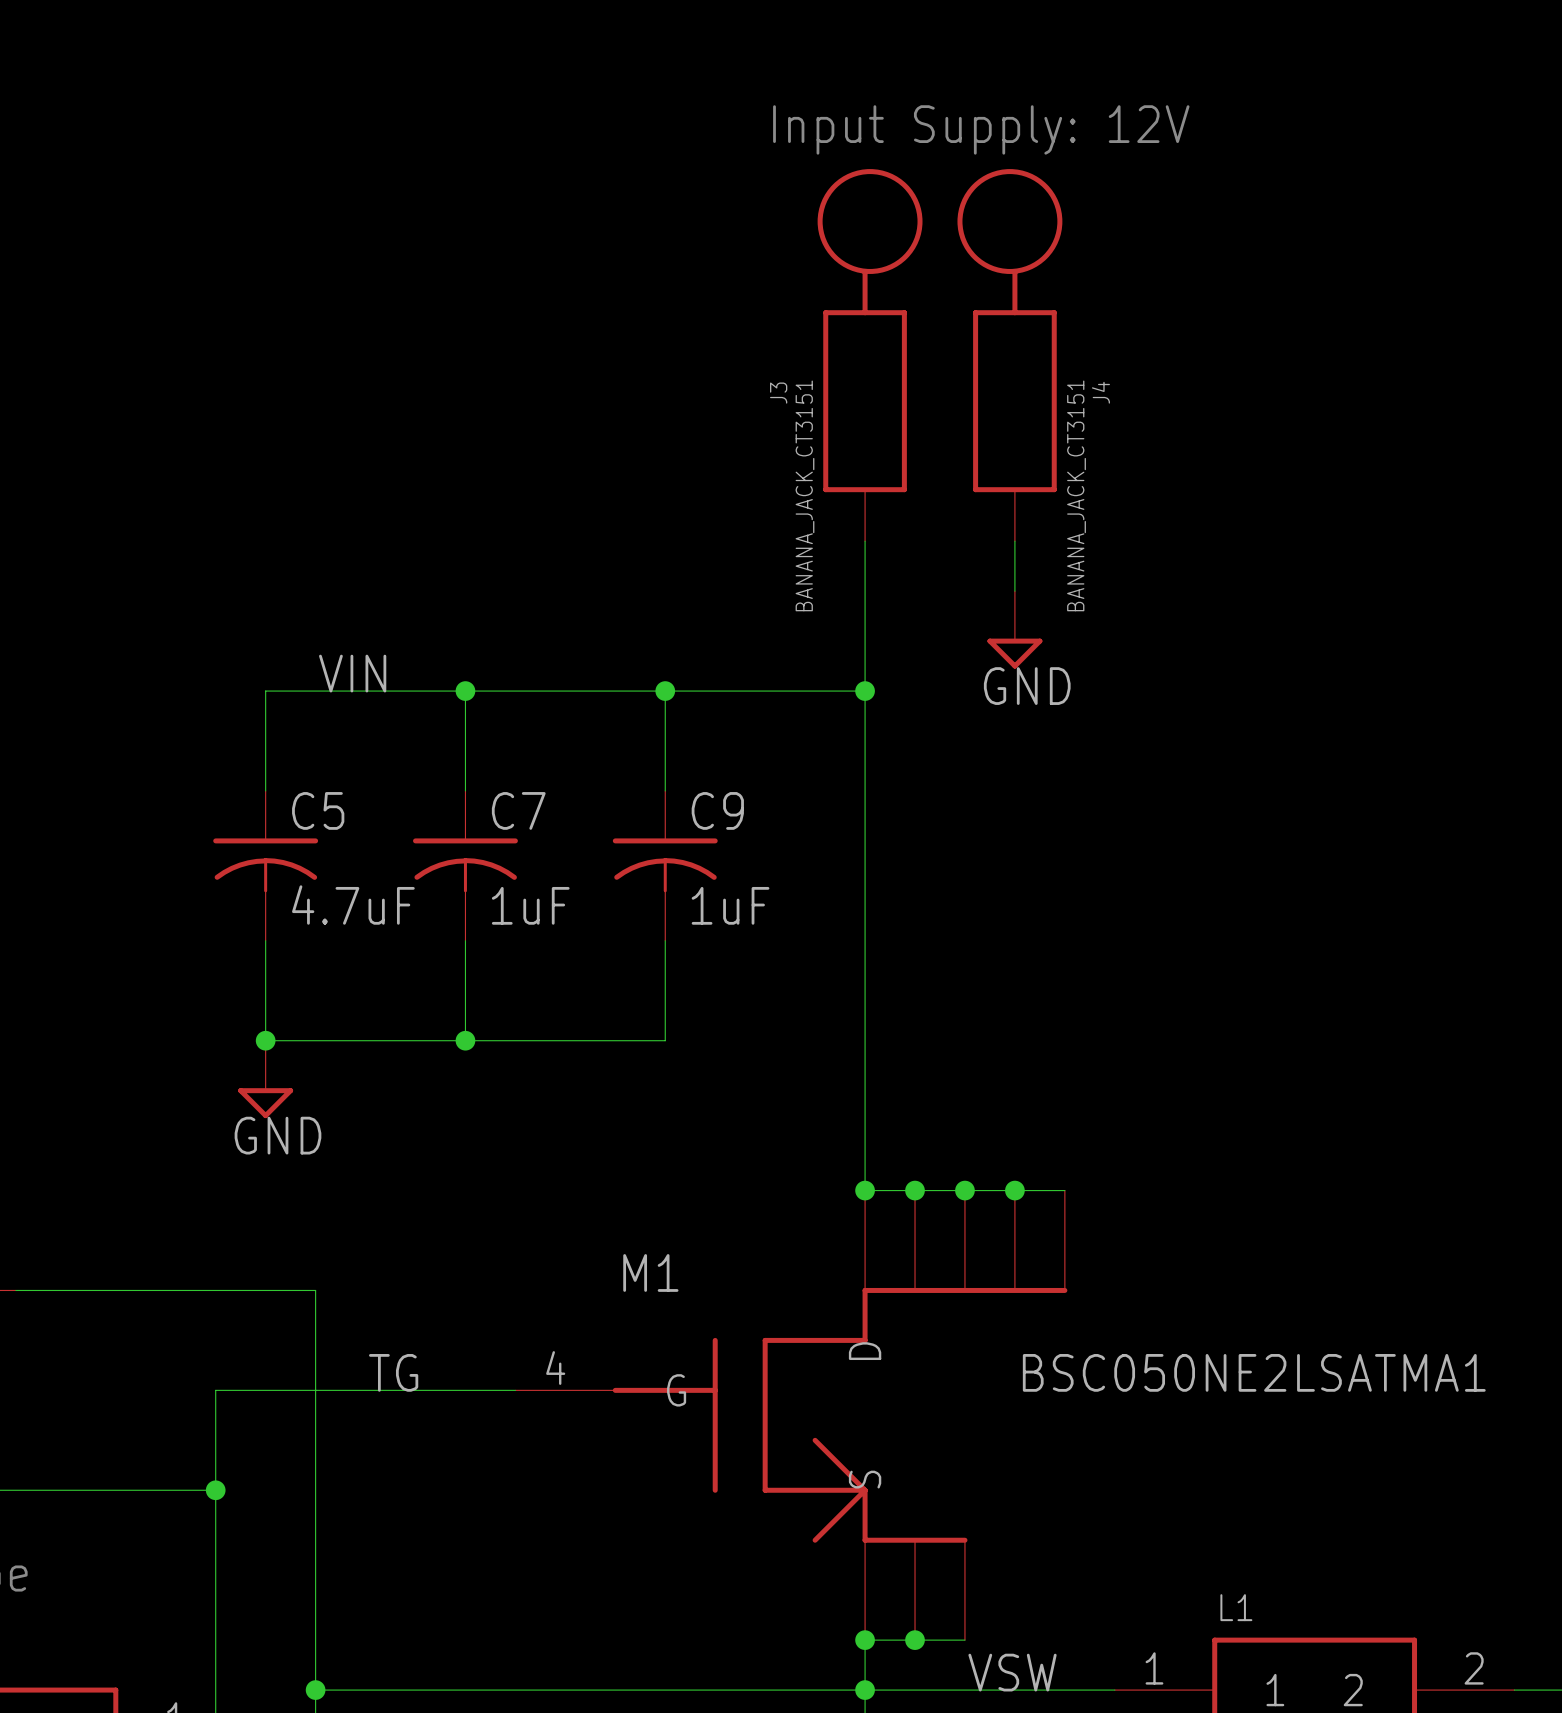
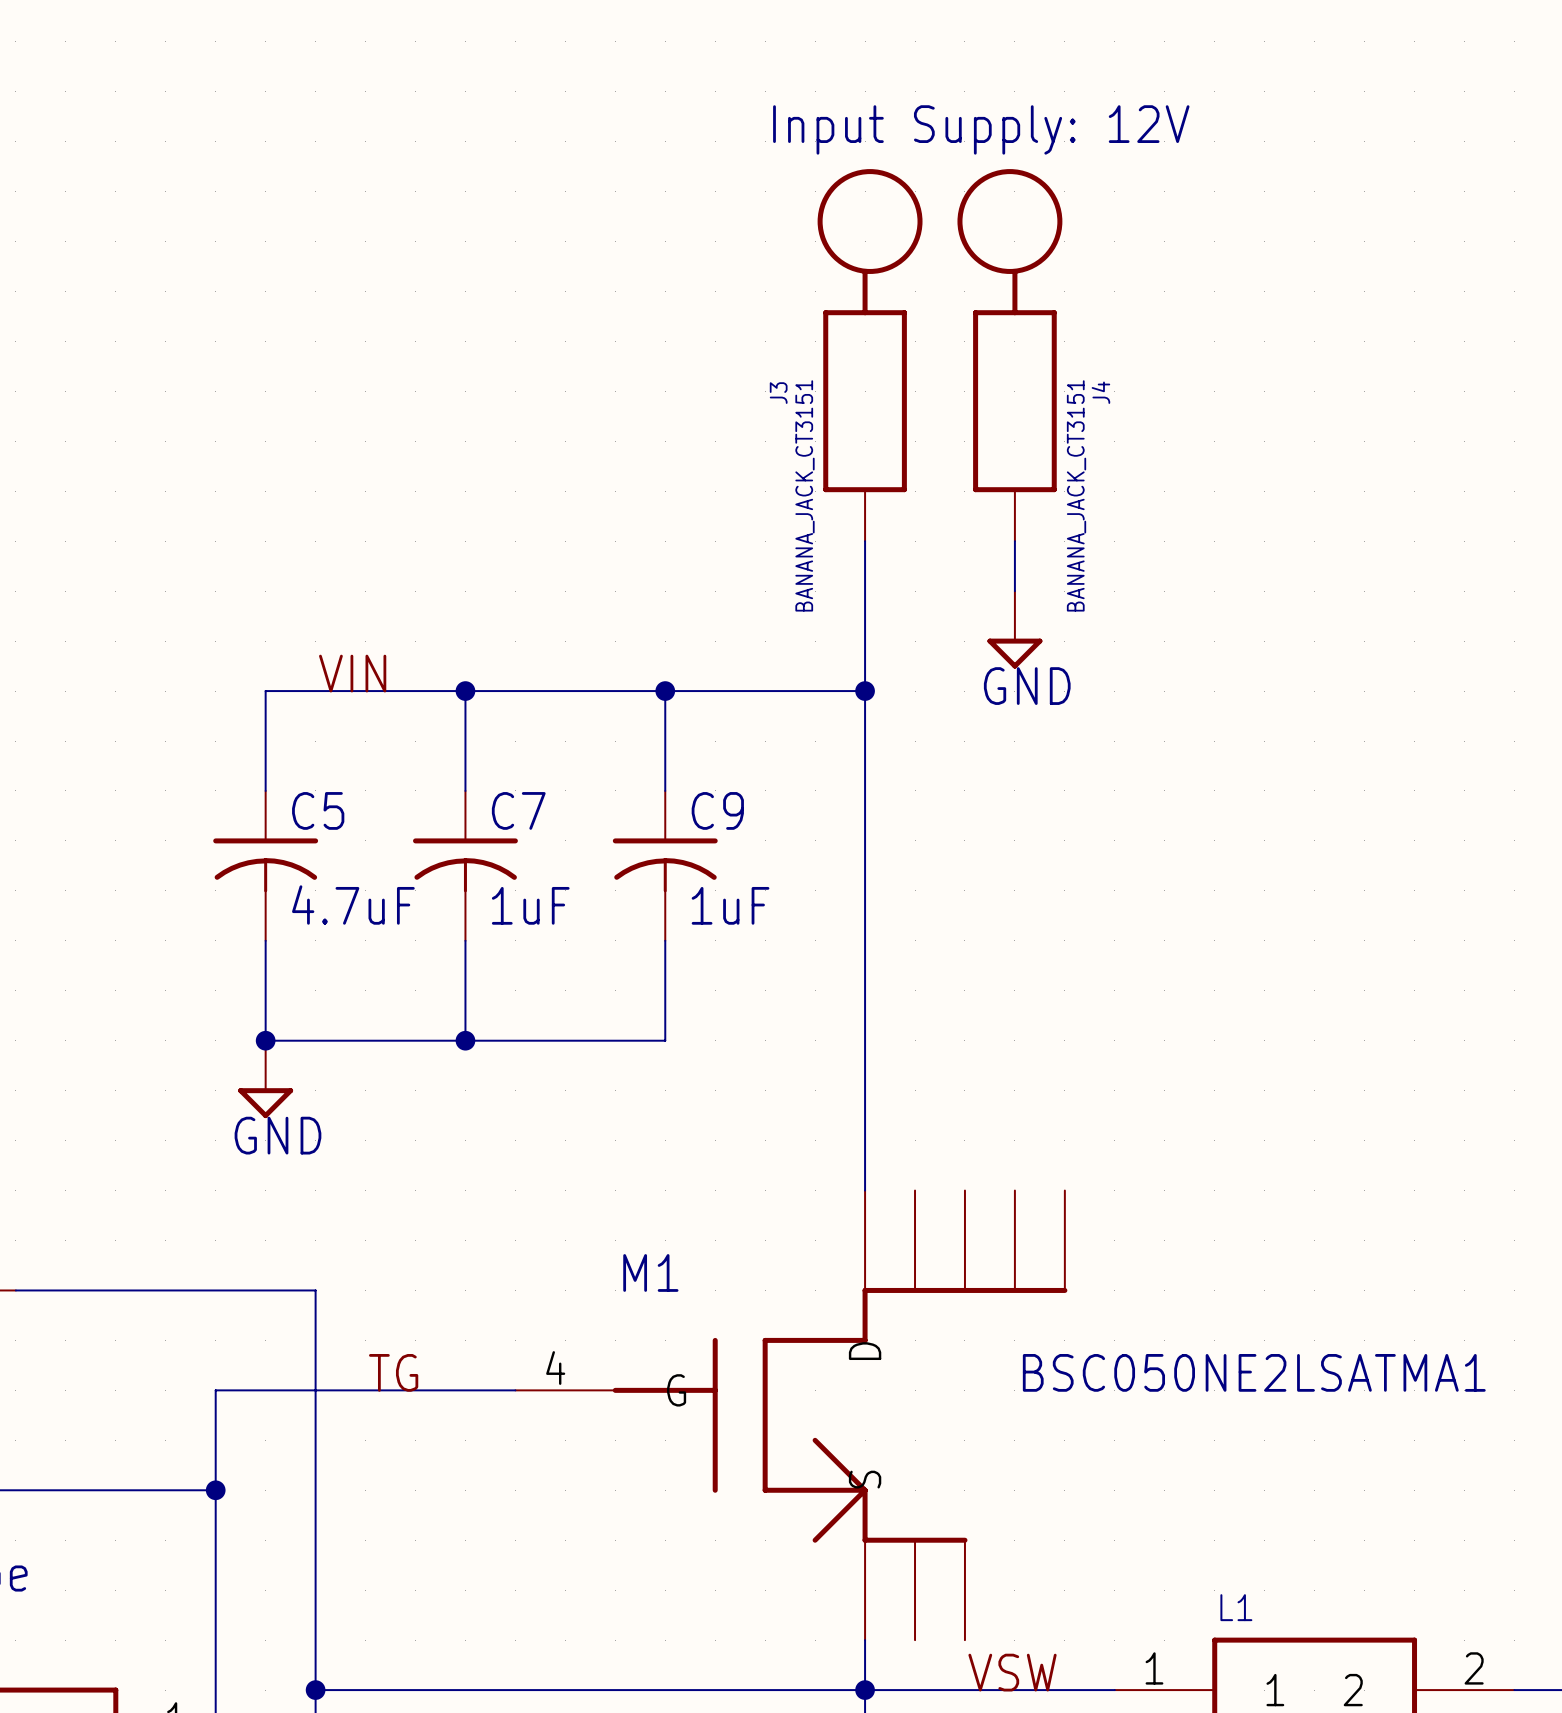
wire: (865, 1190) (1064, 1190) -> none
junction: (865, 1190) -> none
junction: (915, 1190) -> none
junction: (964, 1190) -> none
junction: (1014, 1190) -> none
wire: (865, 1640) (964, 1640) -> none
junction: (865, 1640) -> none
junction: (915, 1640) -> none

